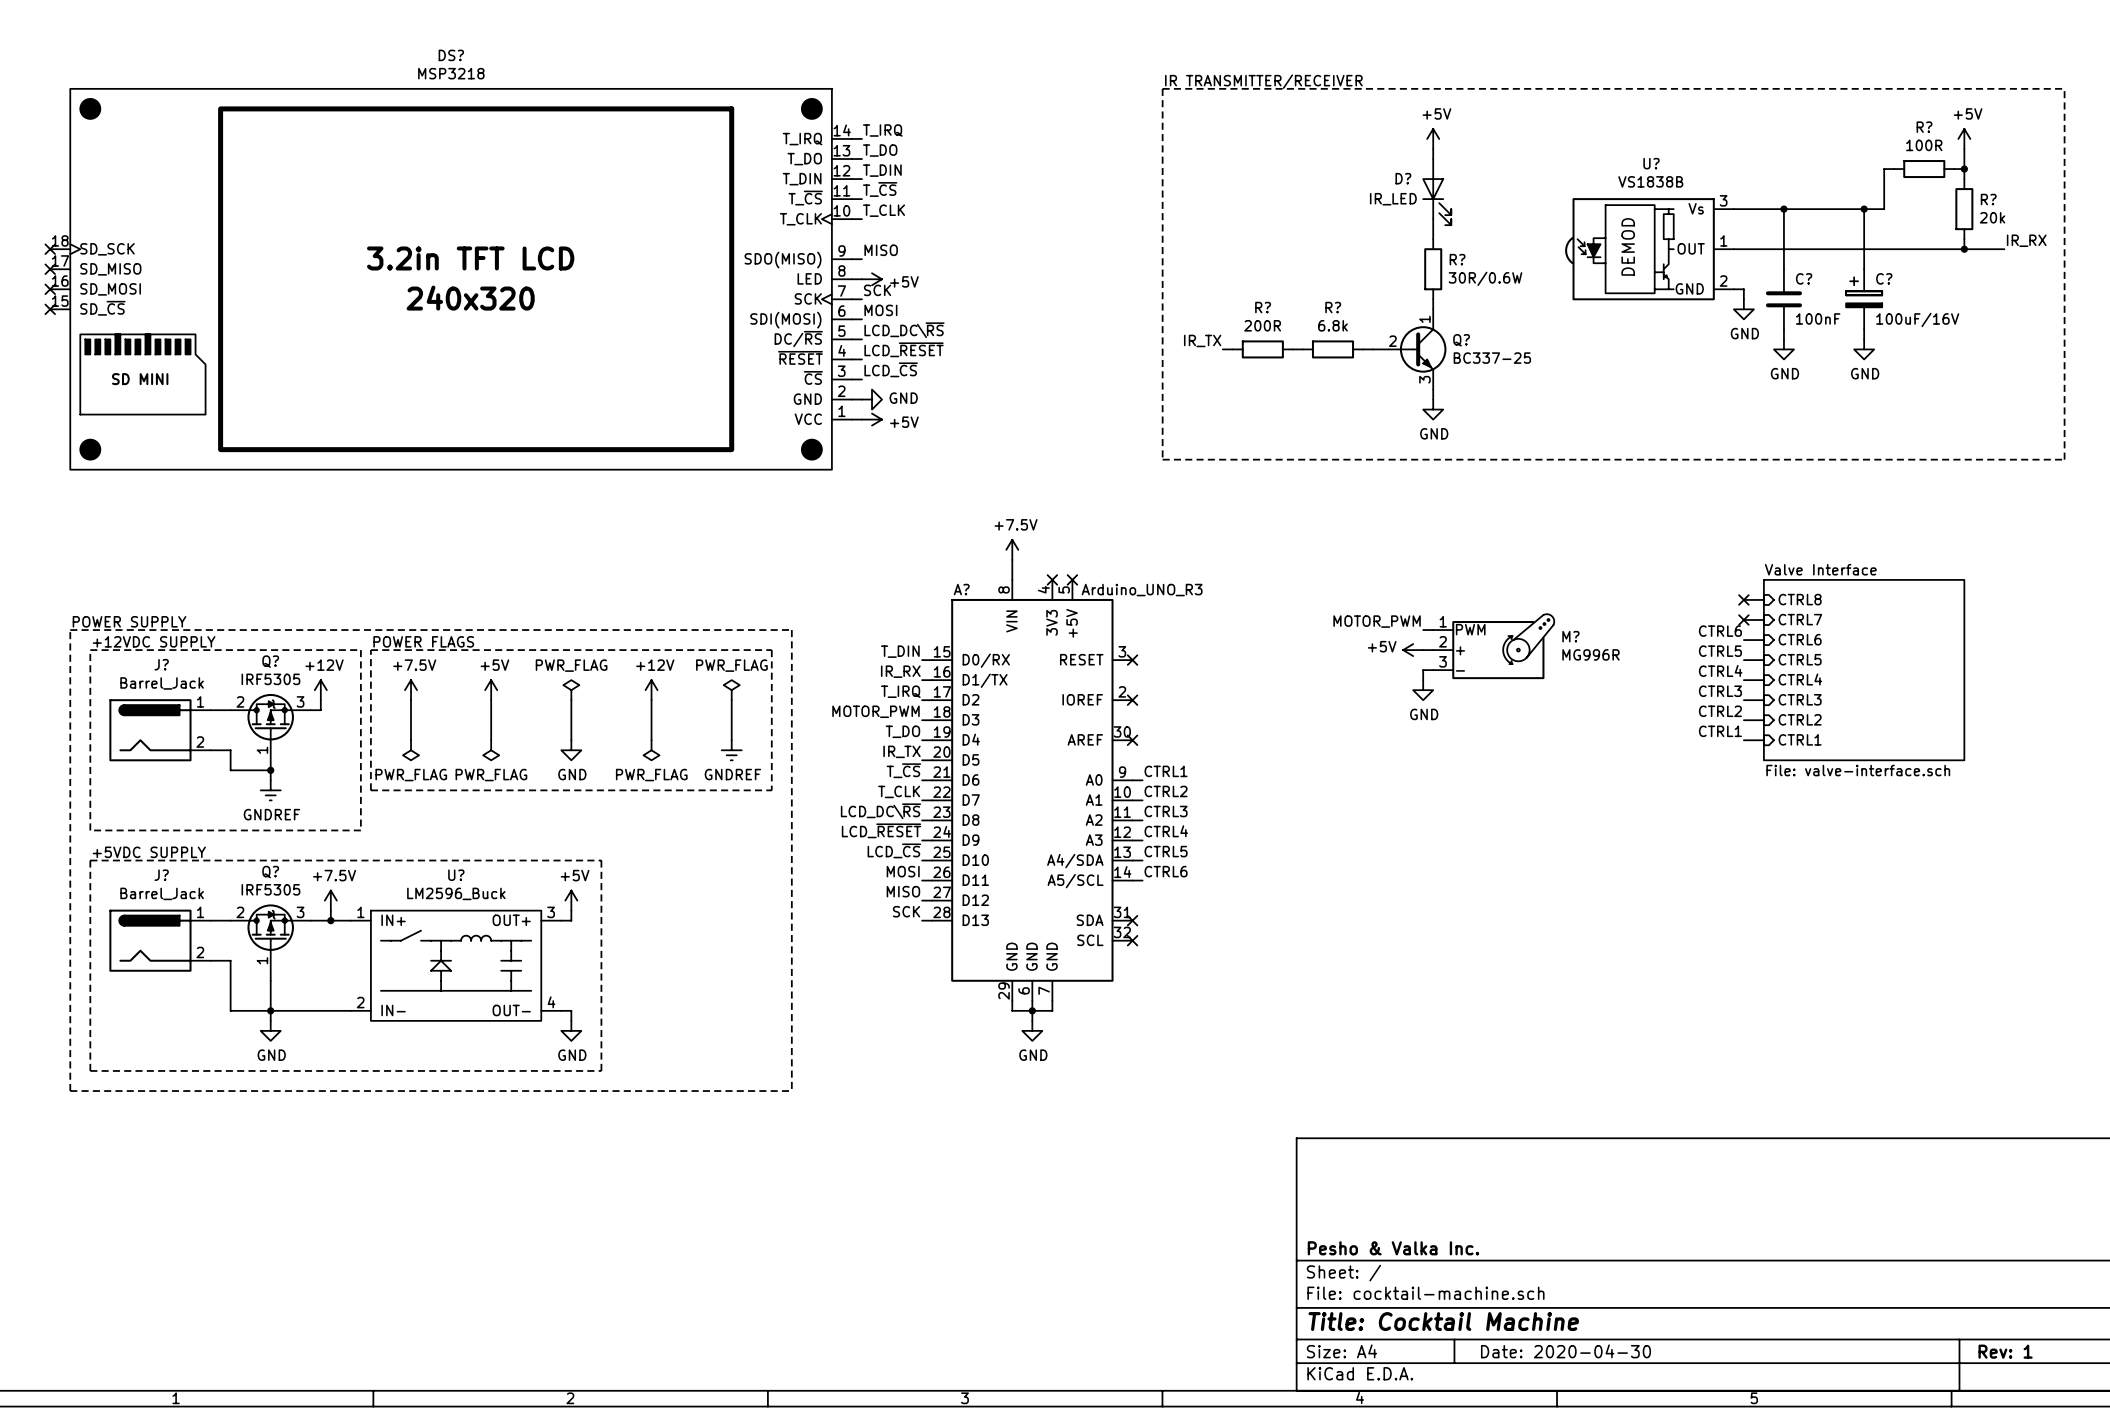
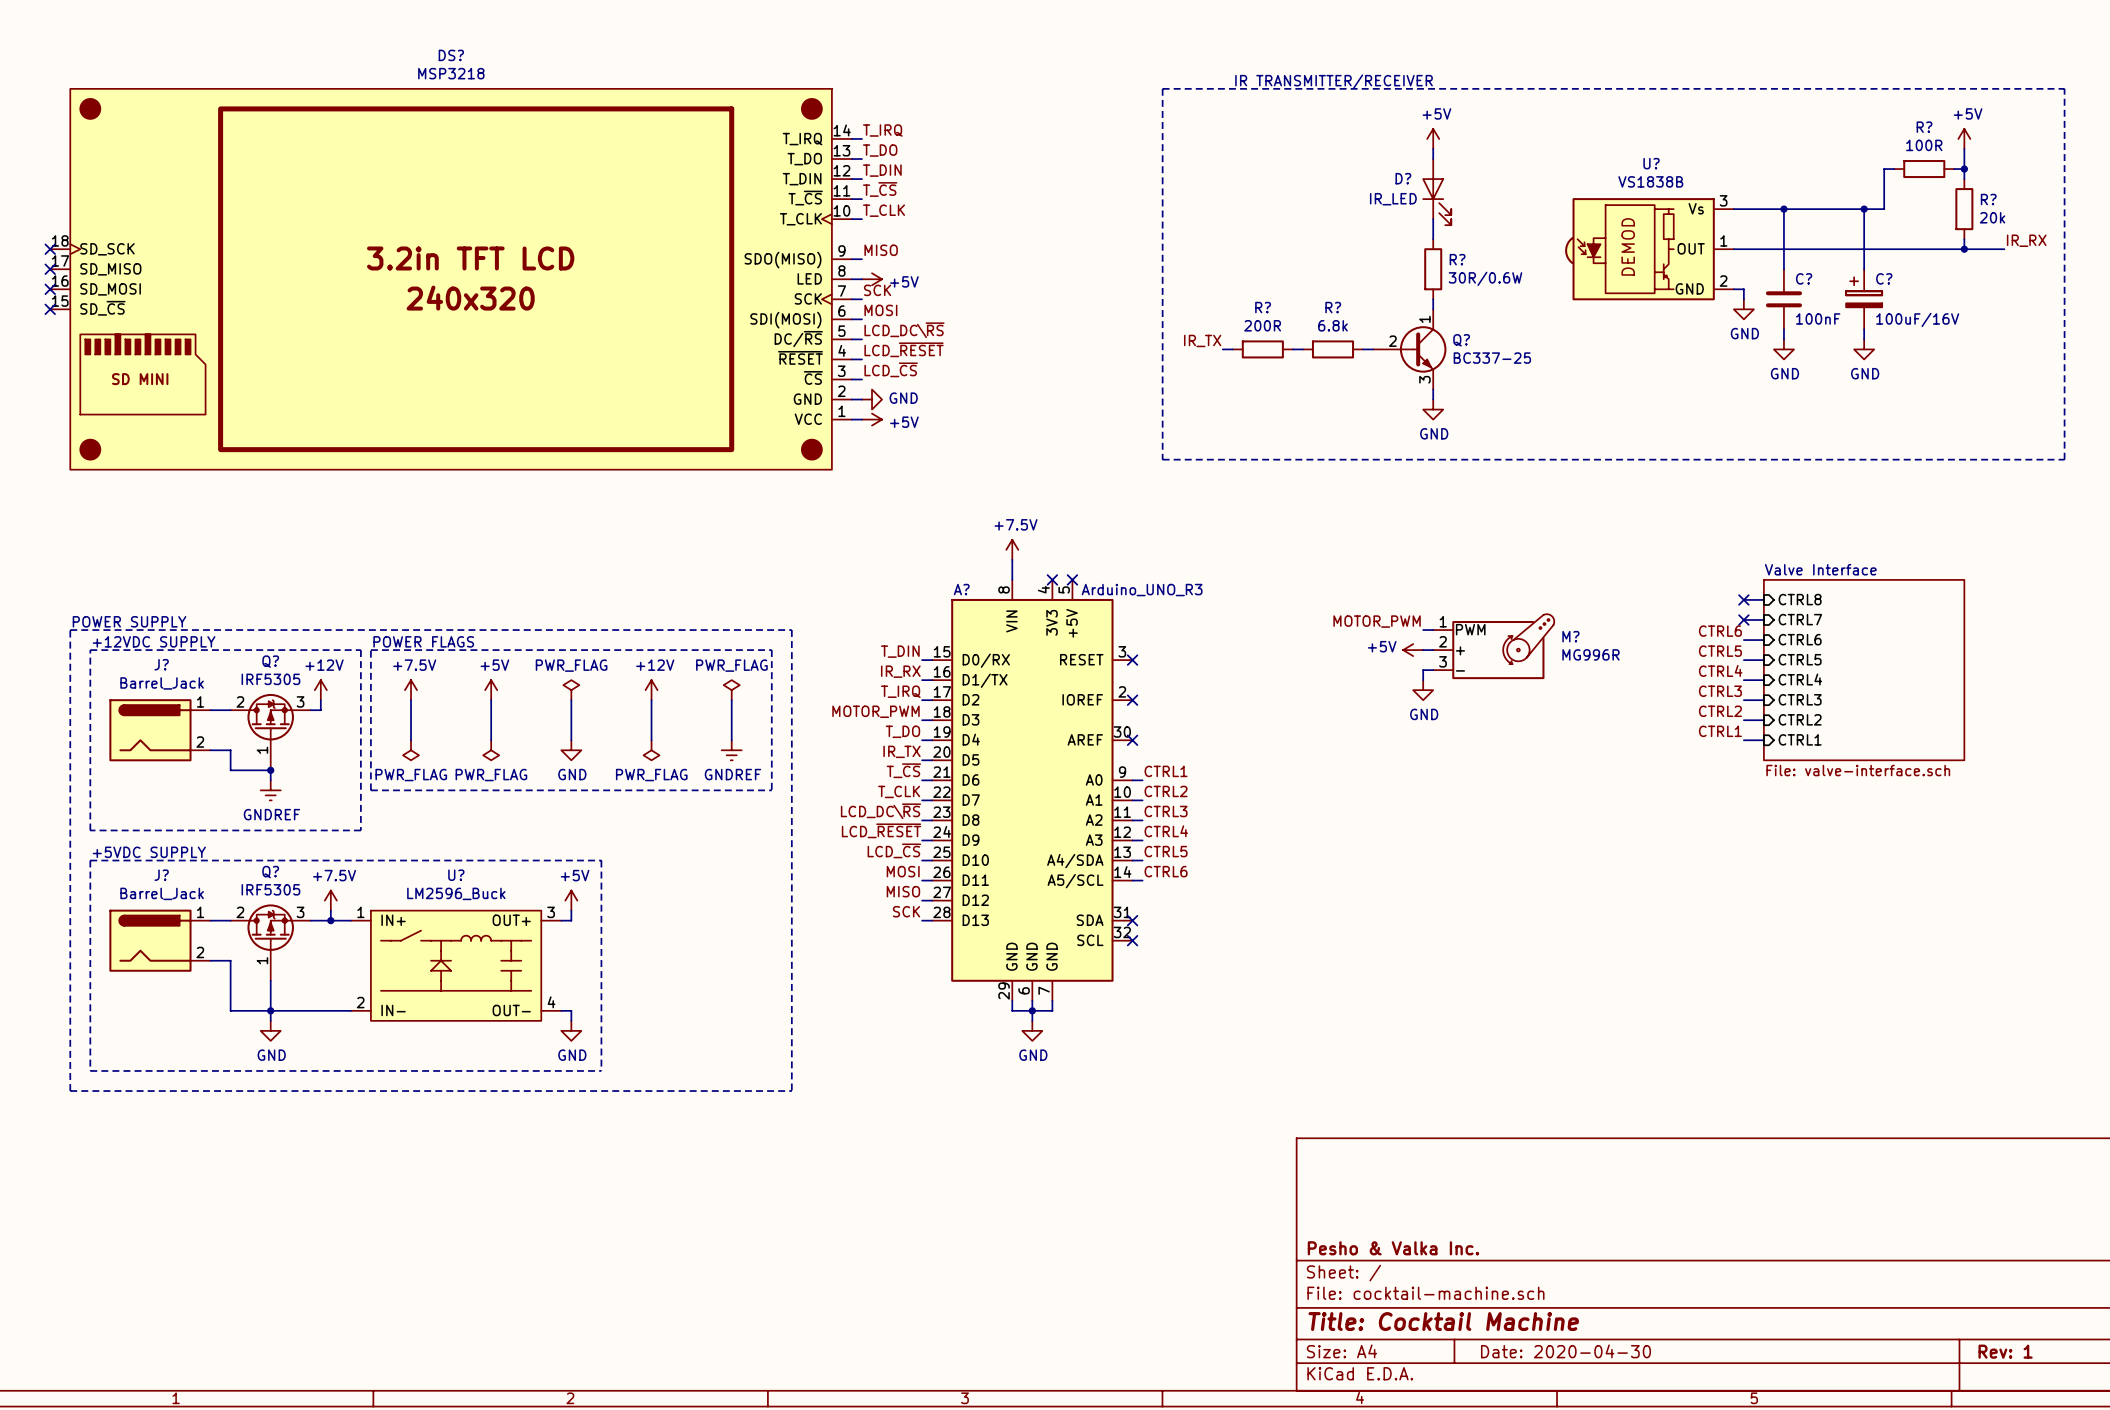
text position: IR TRANSMITTER/RECEIVER (1263, 81) -> IR TRANSMITTER/RECEIVER (1334, 81)

